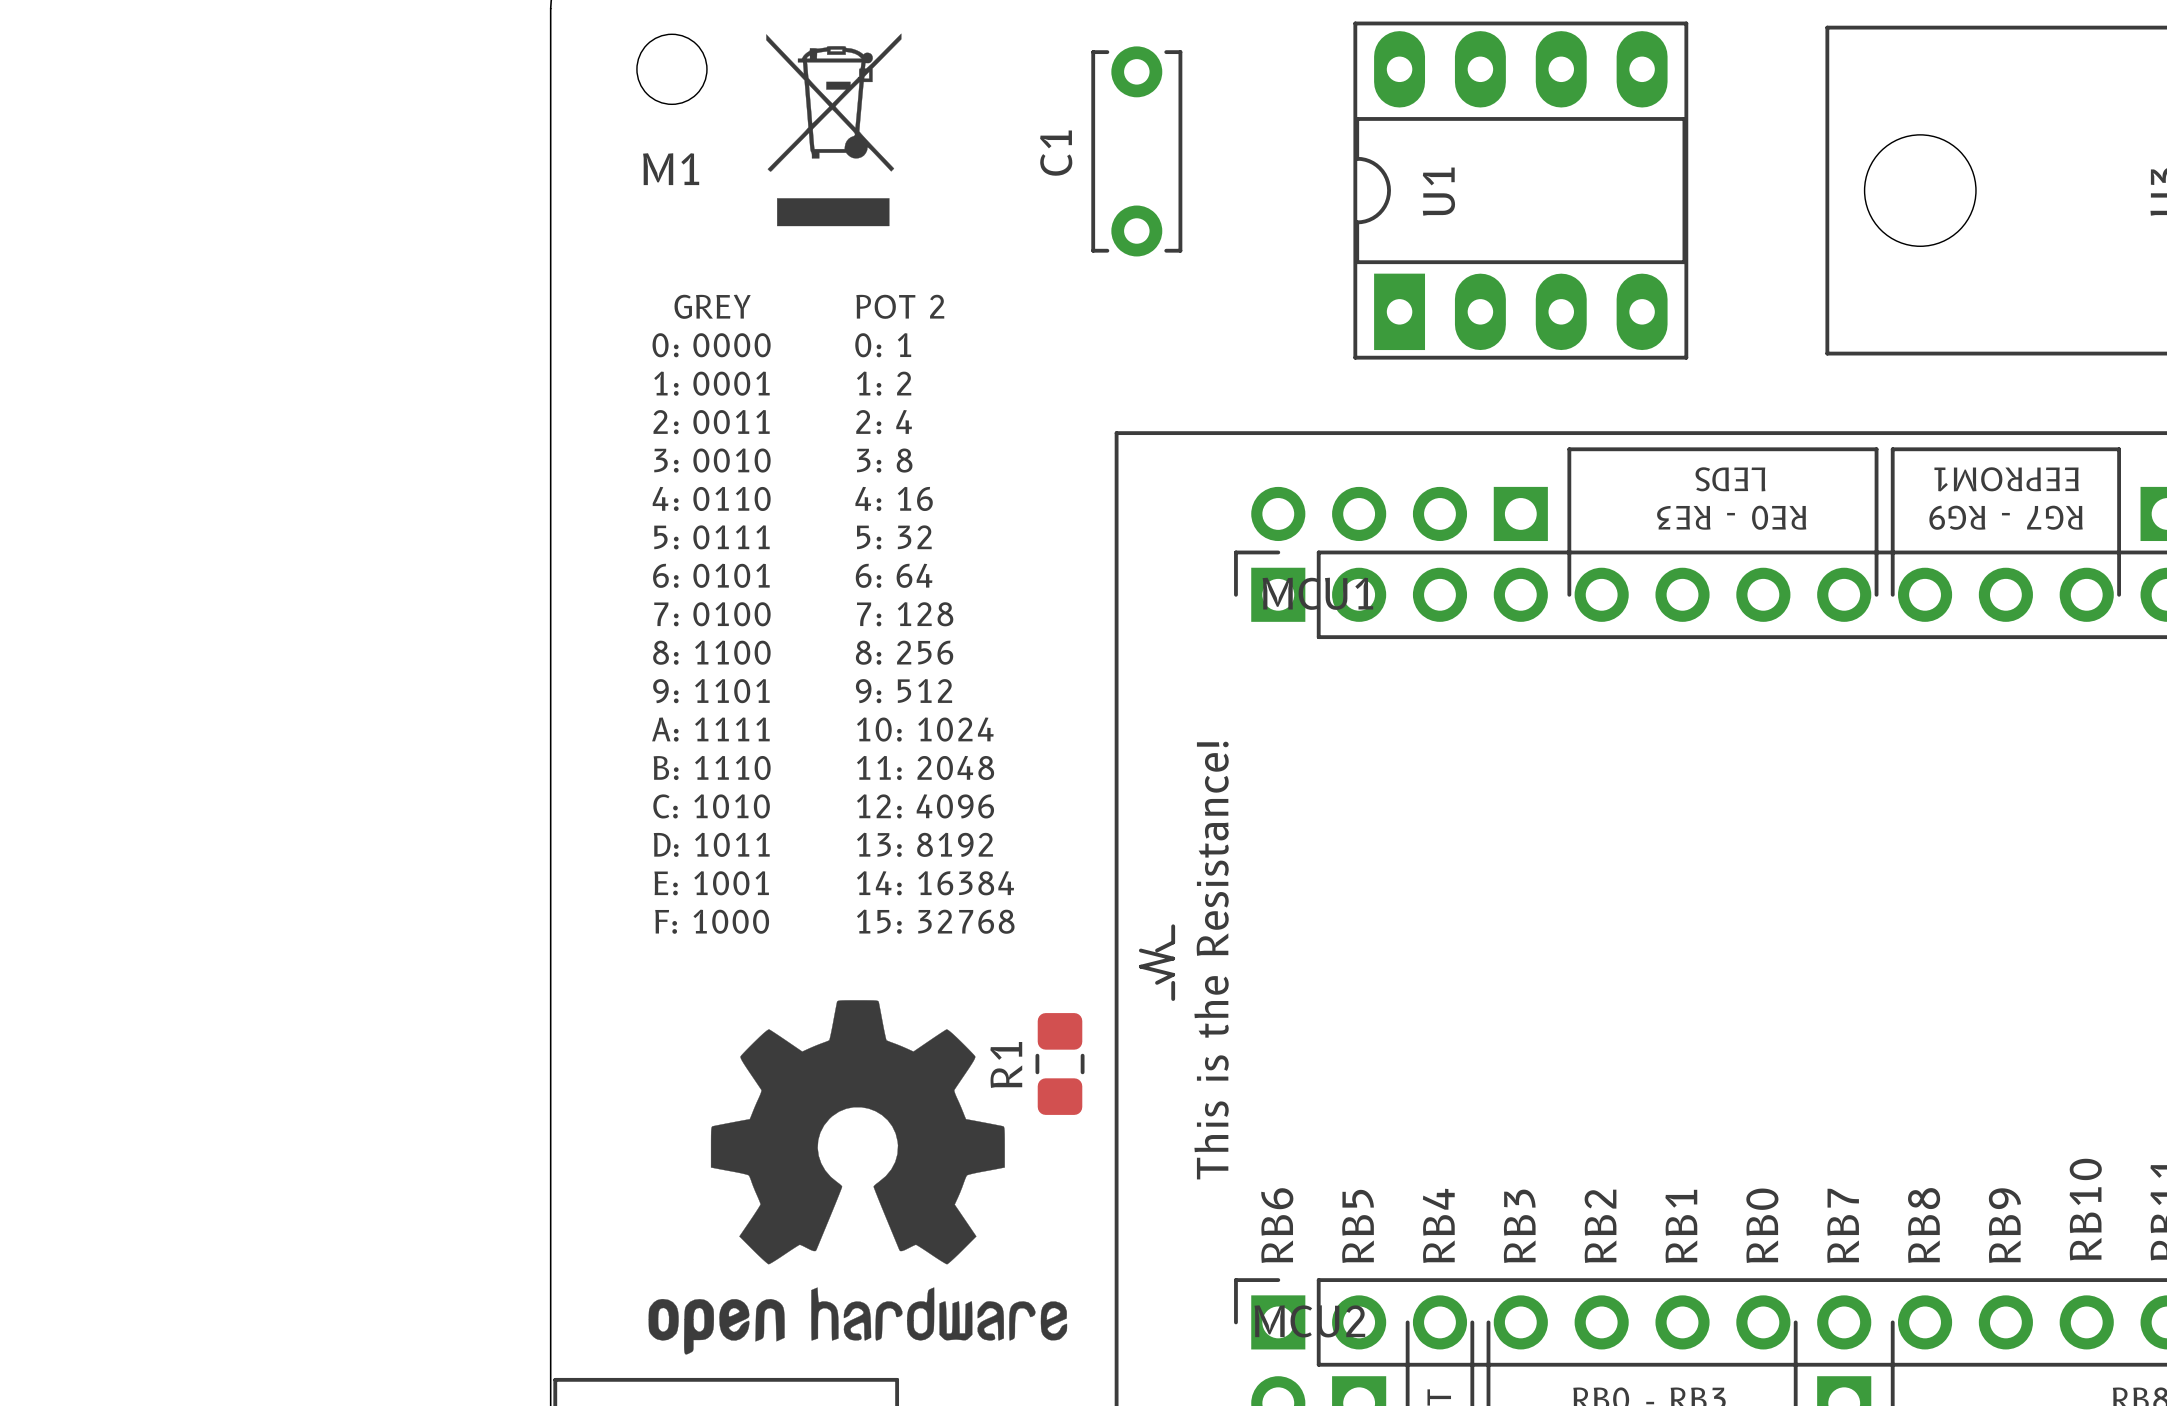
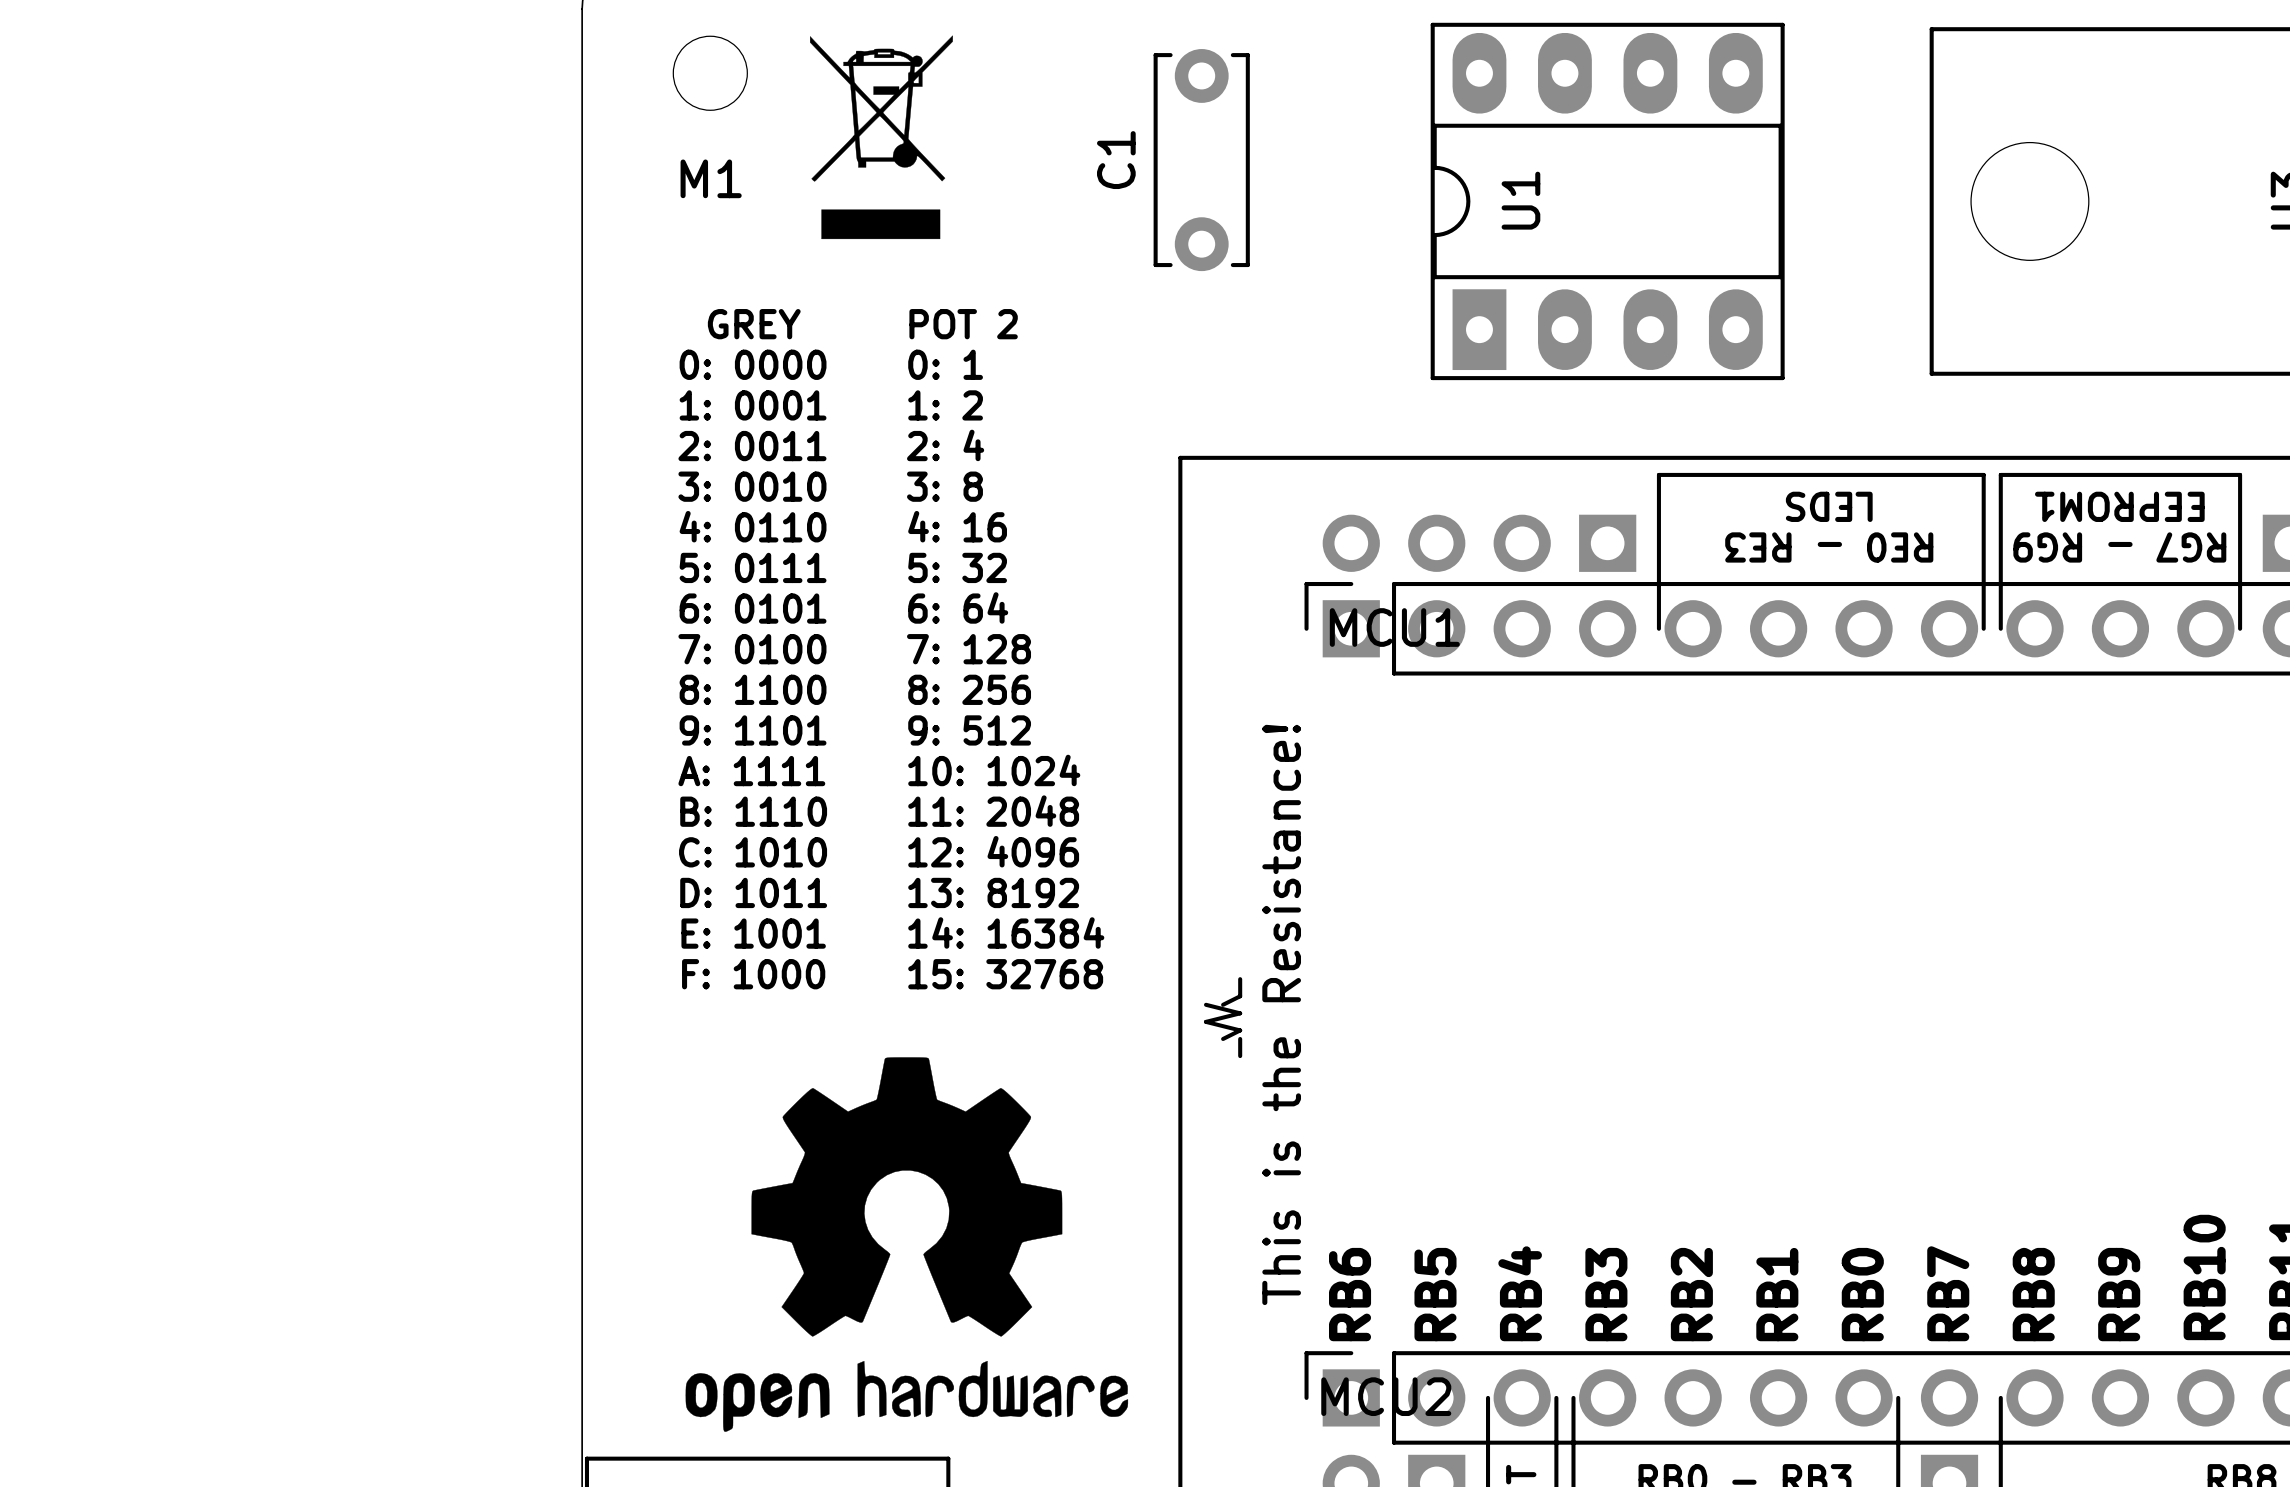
R1: (1060, 1063) -> none

